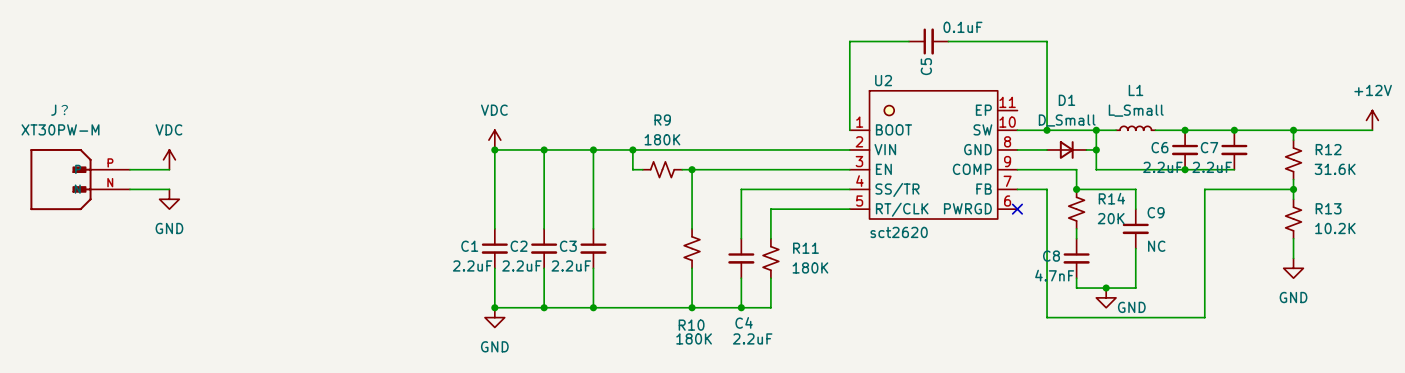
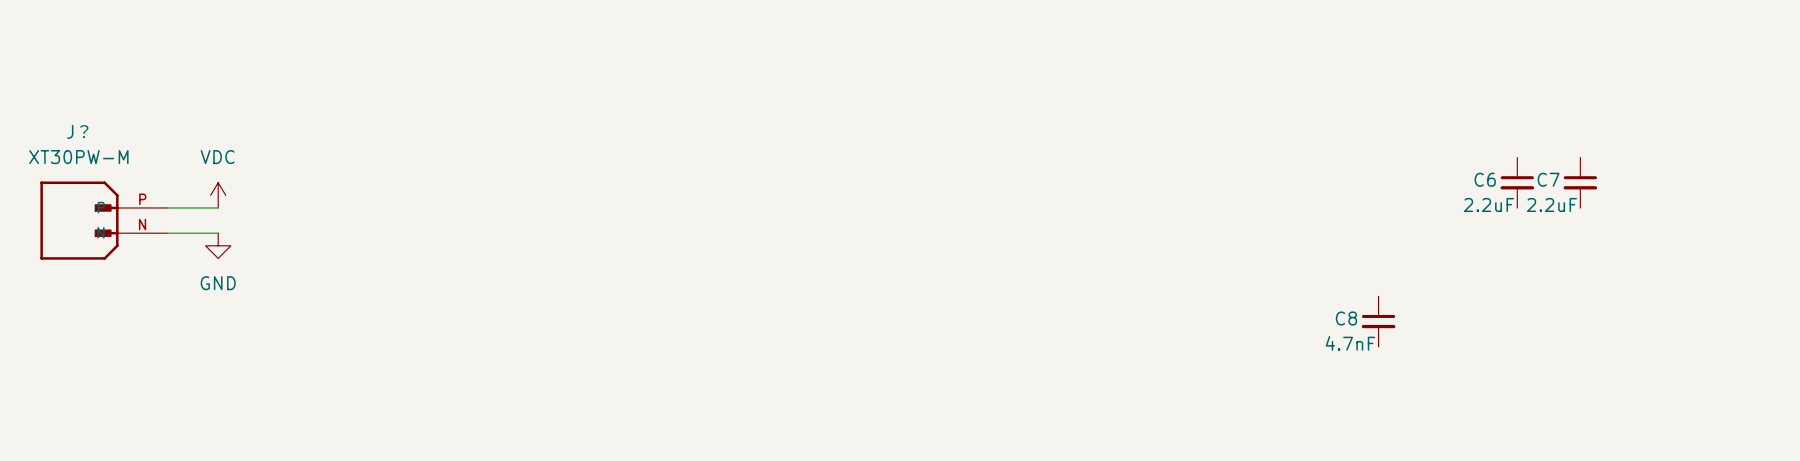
wire: (908, 41) (849, 41) (849, 130) -> none
C5: 0.1uF (928, 41) -> none
wire: (948, 41) (1047, 41) (1047, 130) -> none
power symbol: +12V (1372, 120) -> none
L1: L_Small (1135, 128) -> none
wire: (1017, 130) (1116, 130) -> none
junction: (1047, 130) -> none
wire: (1096, 130) (1096, 169) (1234, 169) -> none
junction: (1096, 130) -> none
wire: (1155, 130) (1372, 130) -> none
junction: (1185, 130) -> none
junction: (1234, 130) -> none
wire: (1293, 130) (1293, 140) -> none
junction: (1293, 130) -> none
power symbol: VDC (494, 140) -> none
junction: (494, 149) -> none
wire: (544, 149) (544, 228) -> none
junction: (544, 149) -> none
wire: (593, 149) (593, 228) -> none
junction: (593, 149) -> none
wire: (632, 149) (632, 169) (642, 169) -> none
junction: (632, 149) -> none
wire: (849, 149) (494, 149) (494, 228) -> none
wire: (1017, 149) (1047, 149) -> none
D1: D_Small (1066, 149) -> none
wire: (1086, 149) (1096, 149) -> none
junction: (1096, 149) -> none
U2: sct2620 (933, 154) -> none
R12: 31.6K (1293, 159) -> none
R9: 180K (662, 169) -> none
wire: (682, 169) (849, 169) -> none
wire: (692, 169) (692, 228) -> none
junction: (692, 169) -> none
wire: (1017, 169) (1076, 169) (1076, 189) (1135, 189) (1135, 209) -> none
junction: (1185, 169) -> none
wire: (1293, 179) (1293, 199) -> none
wire: (849, 189) (741, 189) (741, 238) -> none
wire: (1017, 189) (1047, 189) (1047, 317) (1204, 317) (1204, 189) (1293, 189) -> none
junction: (1076, 189) -> none
junction: (1293, 189) -> none
wire: (849, 209) (770, 209) (770, 238) -> none
no-connect mark: (1017, 209) -> none
R14: 20K (1076, 209) -> none
R13: 10.2K (1293, 219) -> none
wire: (1076, 228) (1076, 238) -> none
C9: NC (1135, 228) -> none
wire: (1293, 238) (1293, 258) -> none
C1: 2.2uF (494, 248) -> none
C2: 2.2uF (544, 248) -> none
C3: 2.2uF (593, 248) -> none
R10: 180K (692, 248) -> none
wire: (1135, 248) (1135, 288) (1076, 288) (1076, 278) -> none
C4: 2.2uF (741, 258) -> none
R11: 180K (770, 258) -> none
wire: (494, 268) (494, 307) (770, 307) (770, 278) -> none
wire: (544, 268) (544, 307) -> none
wire: (593, 268) (593, 307) -> none
wire: (692, 268) (692, 307) -> none
power symbol: GND (1293, 268) -> none
wire: (741, 278) (741, 307) -> none
junction: (1106, 288) -> none
power symbol: GND (1106, 297) -> none
junction: (494, 307) -> none
junction: (544, 307) -> none
junction: (593, 307) -> none
junction: (692, 307) -> none
junction: (741, 307) -> none
power symbol: GND (494, 317) -> none

